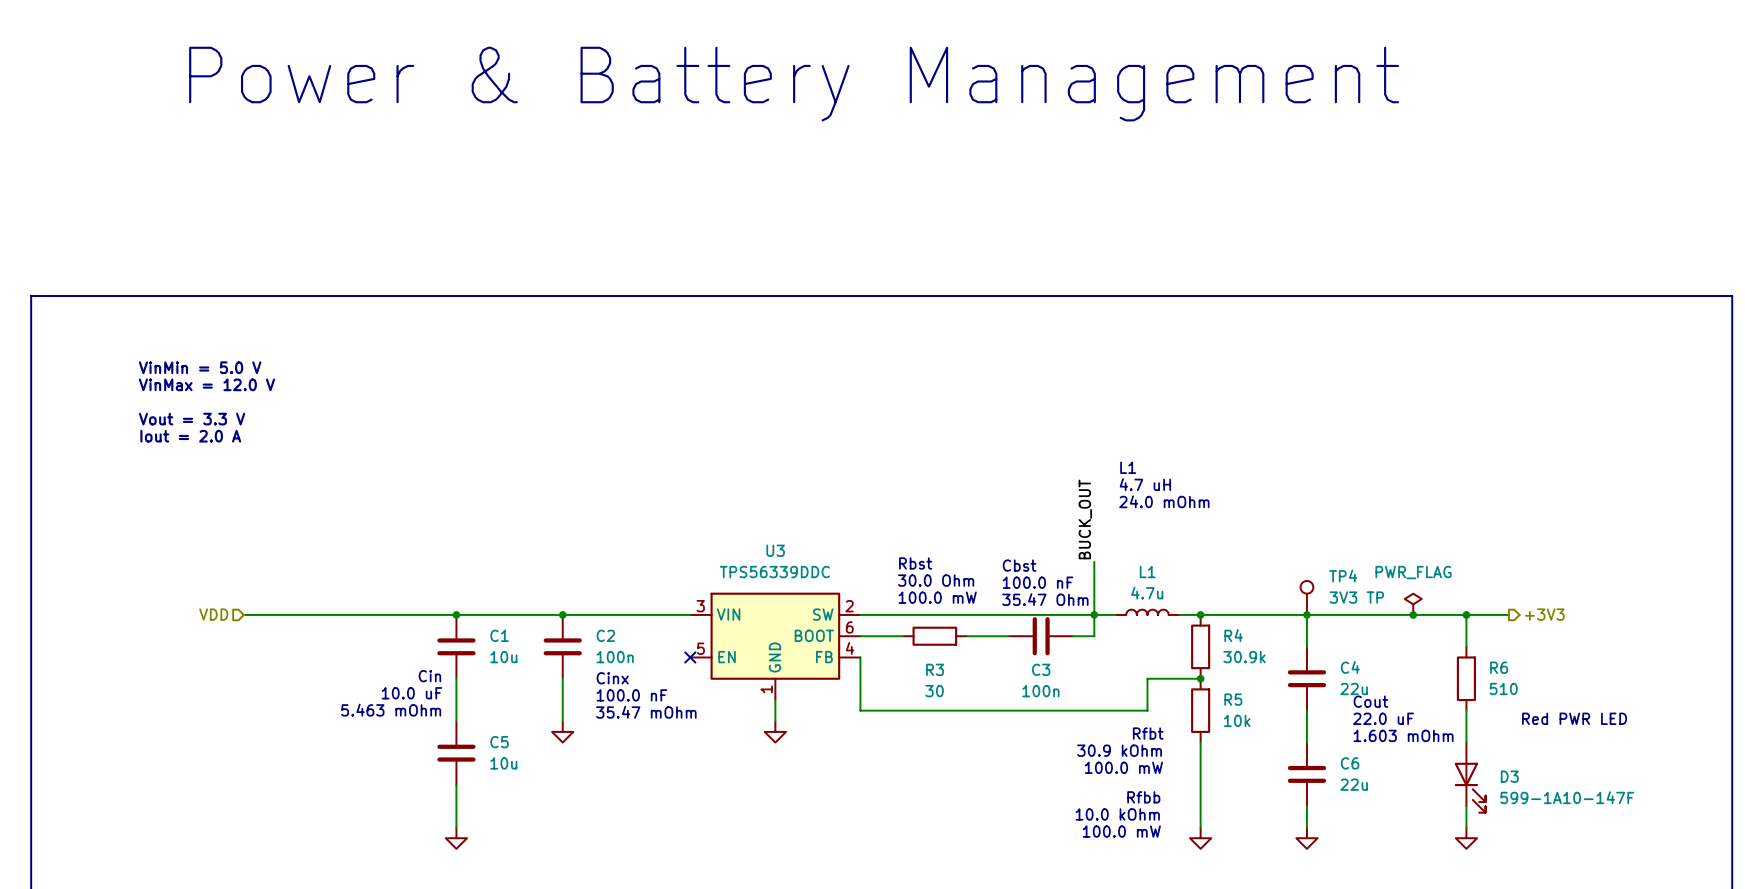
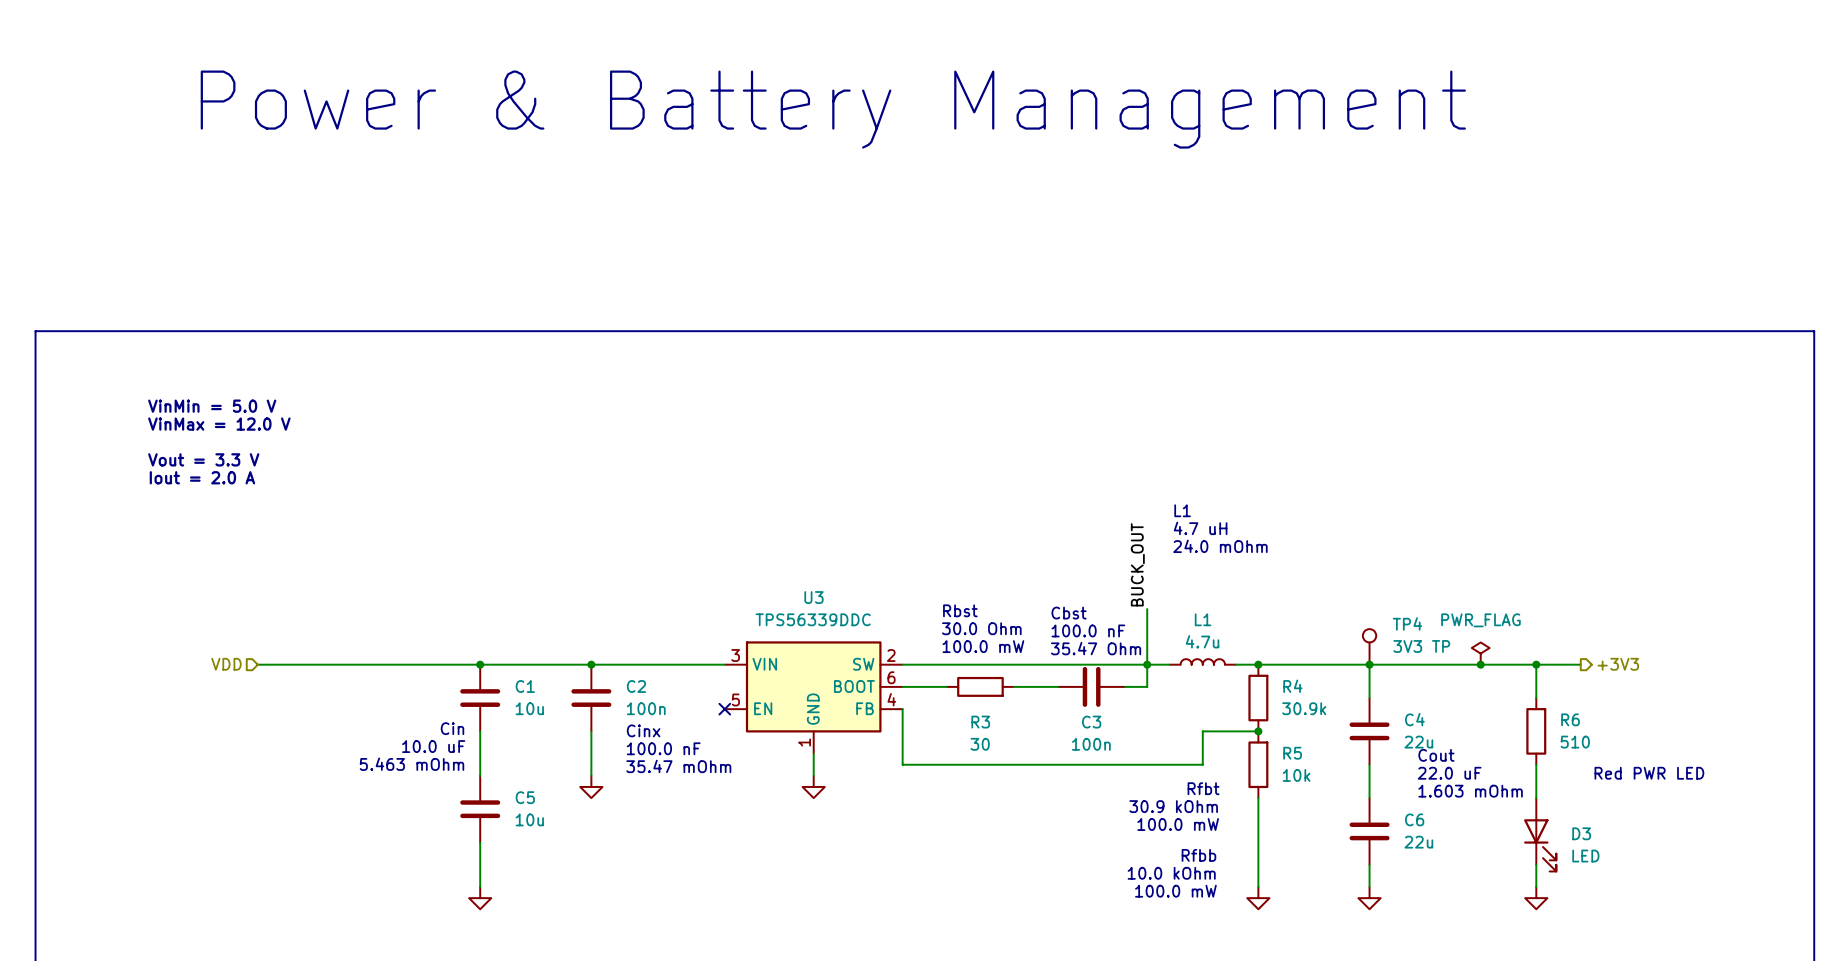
D3 value: 599-1A10-147F (1567, 797) -> LED (1585, 856)

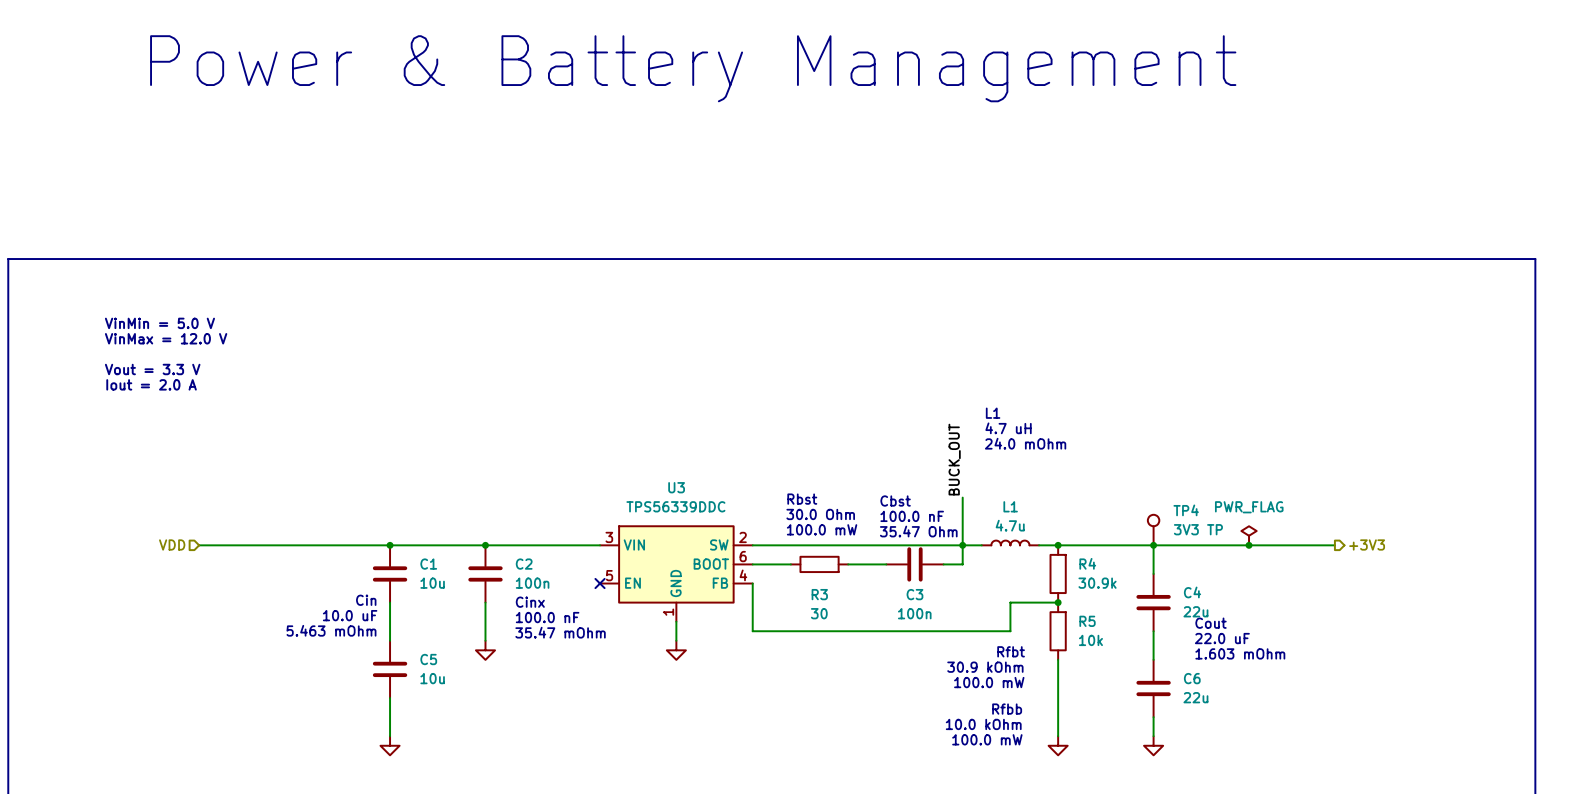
wire: (1536, 664) (1536, 698) -> none
junction: (1536, 664) -> none
R6: 510 (1536, 731) -> none
wire: (1536, 764) (1536, 798) -> none
text: Red PWR LED (1649, 773) -> none
D3: LED (1540, 834) -> none
wire: (1536, 864) (1536, 887) -> none
power symbol: (1536, 898) -> none

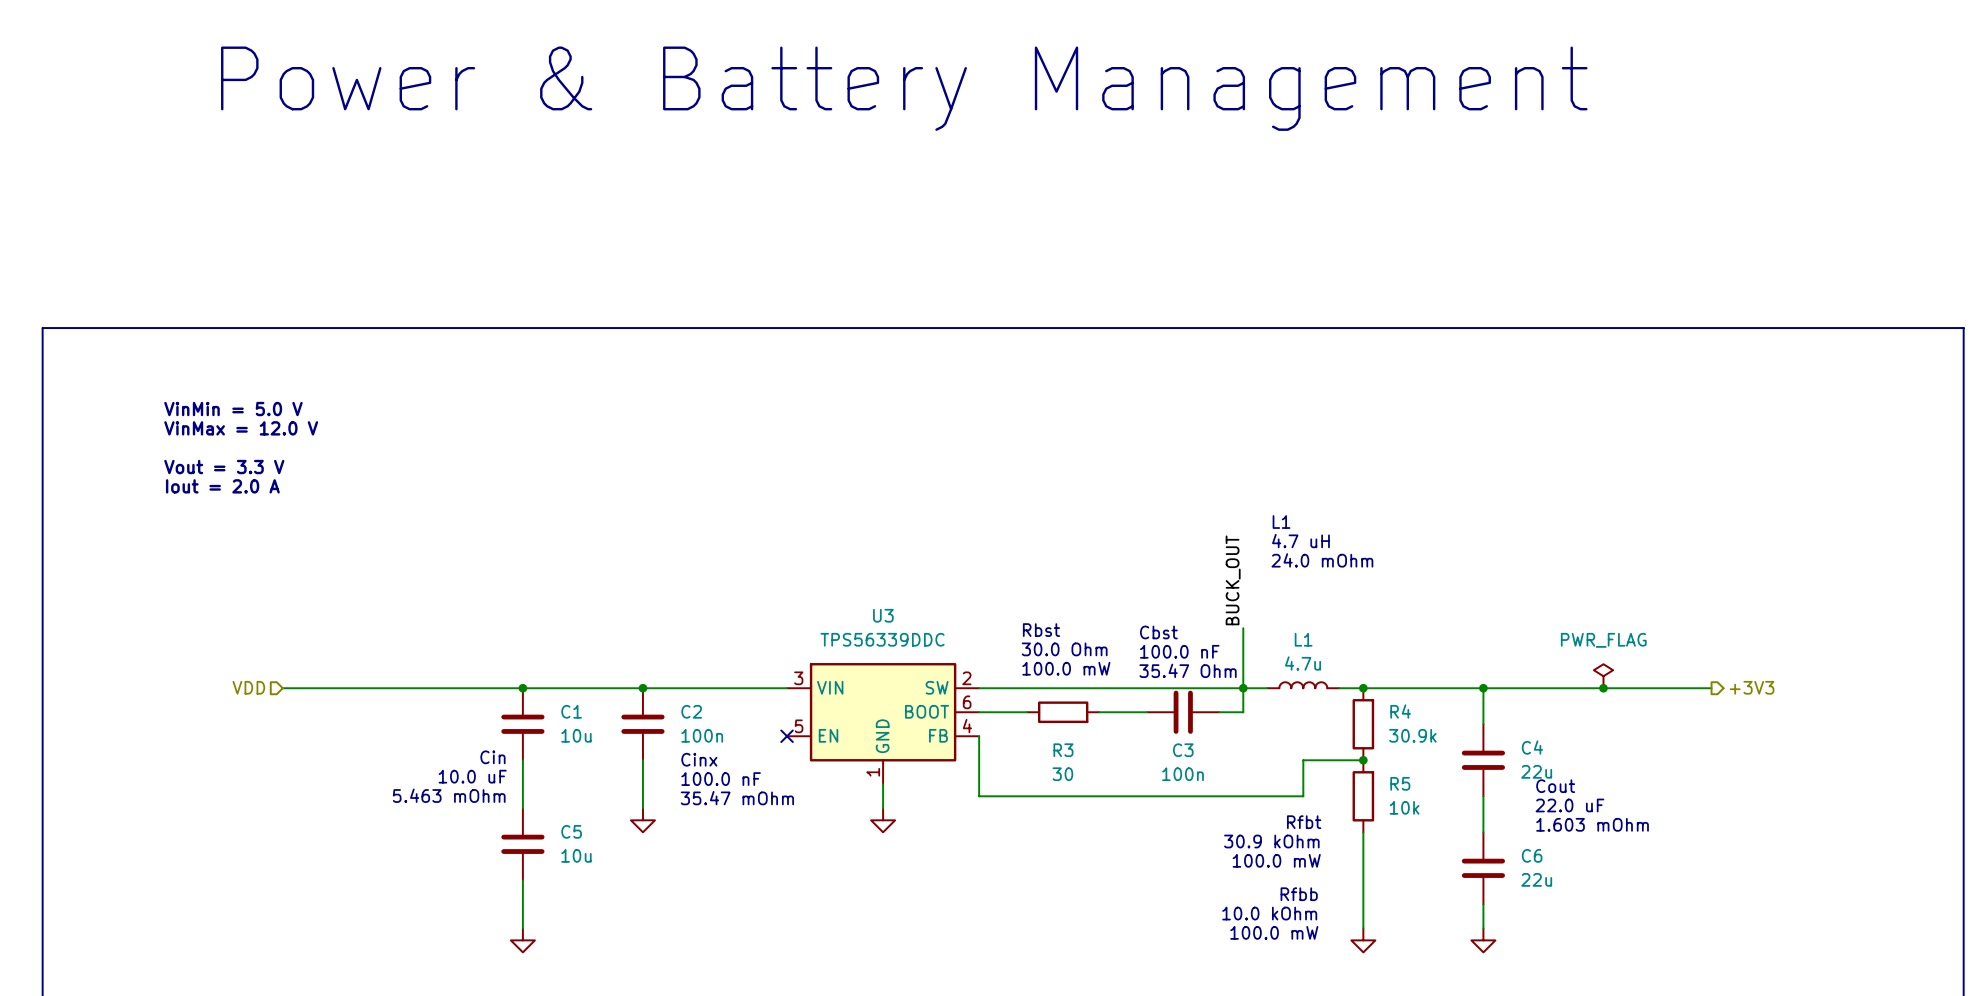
TP4: 3V3 TP (1153, 530) -> none

